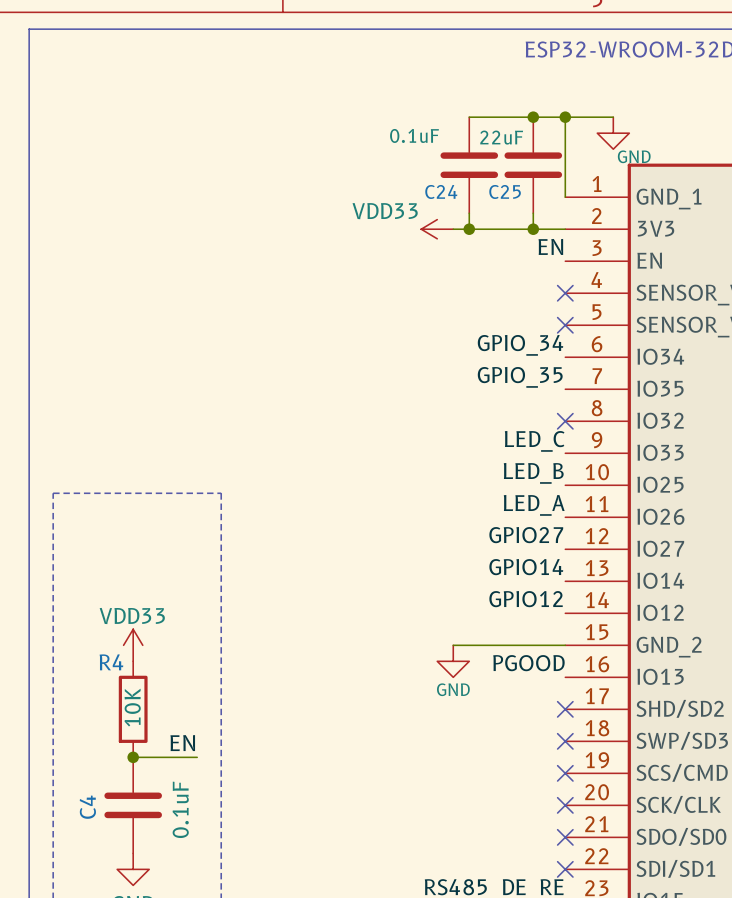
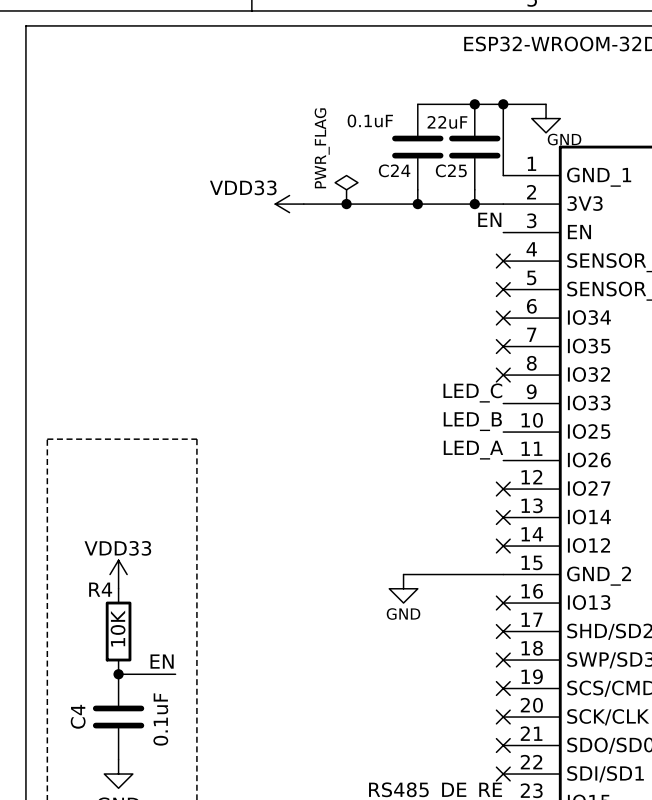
power symbol: none -> PWR_FLAG (346, 189)
wire: none -> (303, 204) (403, 204)
junction: none -> (346, 204)
power symbol position: VDD33 (437, 229) -> VDD33 (289, 204)
label: GPIO_34 (520, 345) -> none
no-connect mark: none -> (503, 318)
label: GPIO_35 (520, 377) -> none
no-connect mark: none -> (503, 346)
label: GPIO27 (526, 535) -> none
no-connect mark: none -> (503, 489)
label: GPIO14 (526, 567) -> none
no-connect mark: none -> (503, 517)
label: GPIO12 (526, 599) -> none
no-connect mark: none -> (503, 546)
label: PGOOD (528, 663) -> none
no-connect mark: none -> (503, 603)

